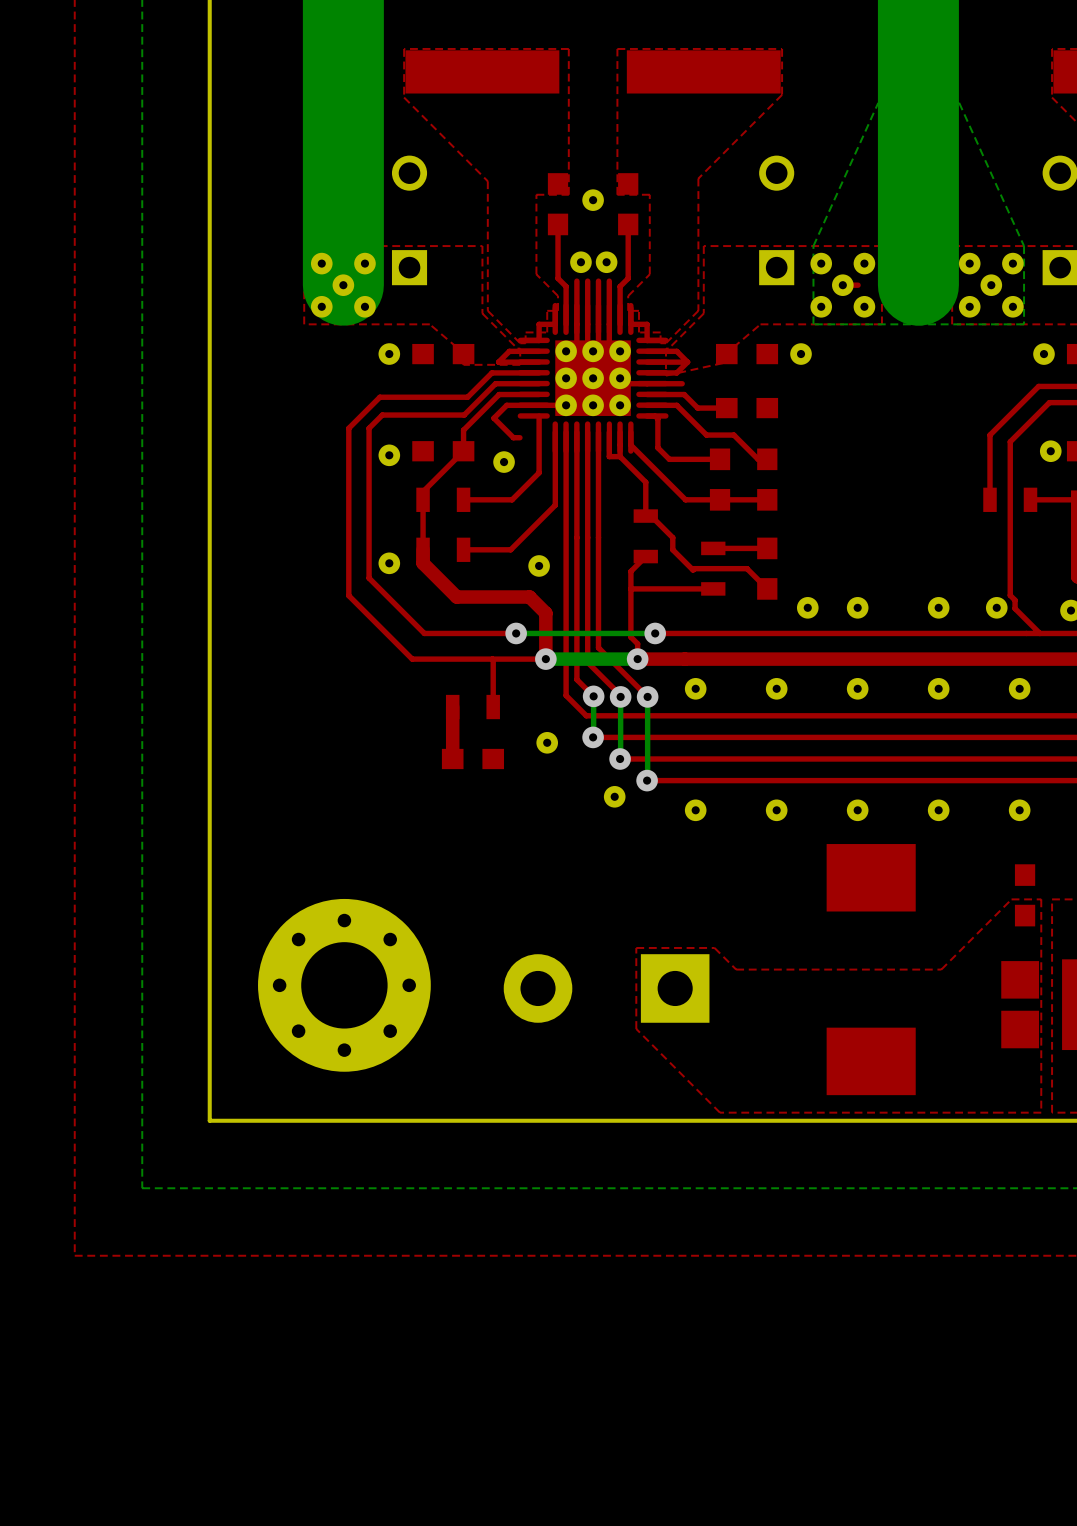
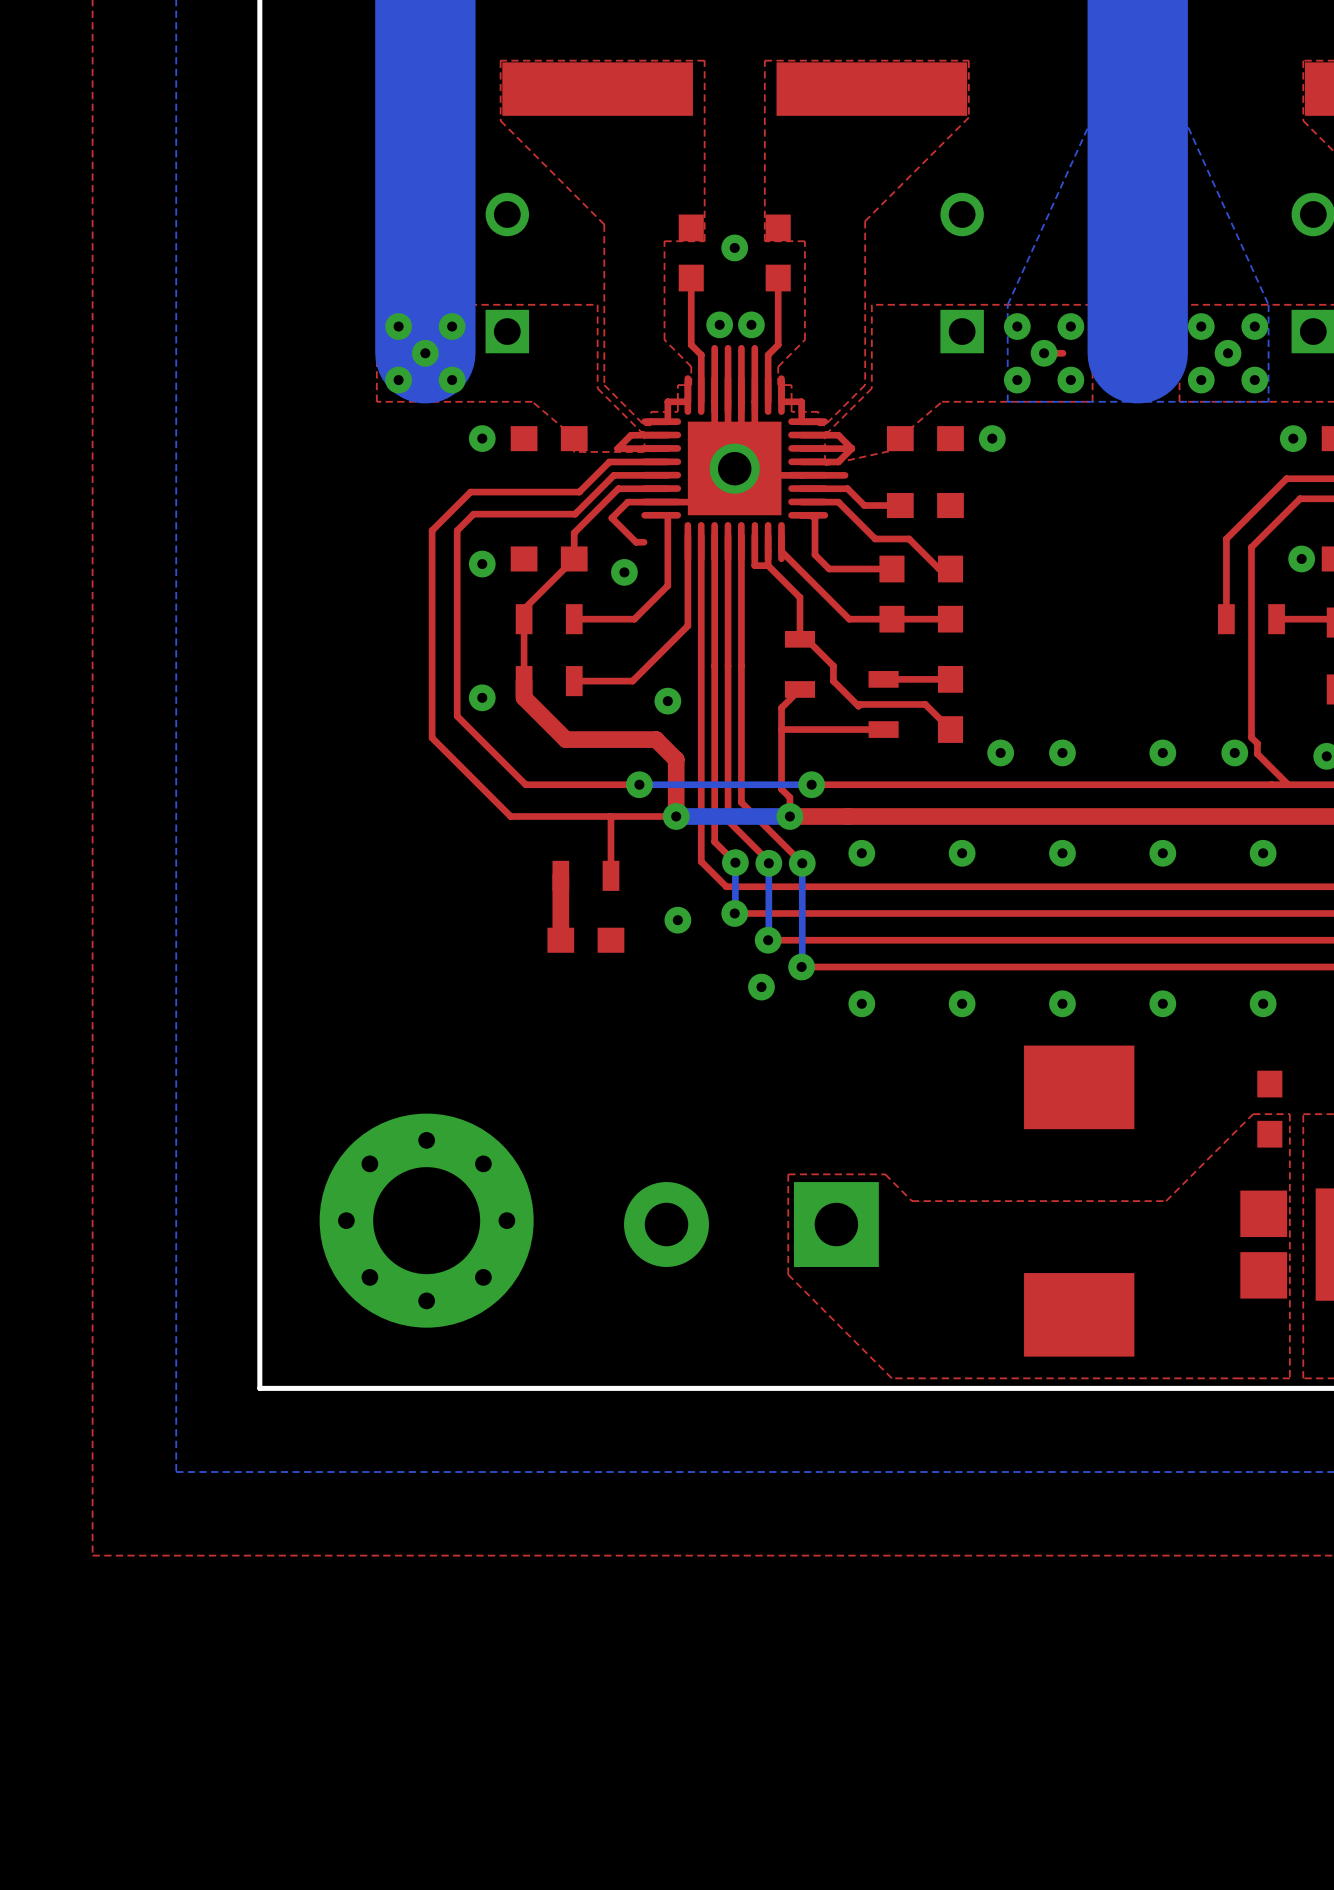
part: (566, 351) -> none
part: (593, 351) -> none
part: (620, 351) -> none
part footprint: [582, 367, 604, 390] -> [709, 443, 760, 494]
part: (566, 378) -> none
part: (620, 378) -> none
part: (566, 405) -> none
part: (593, 405) -> none
part: (620, 405) -> none

